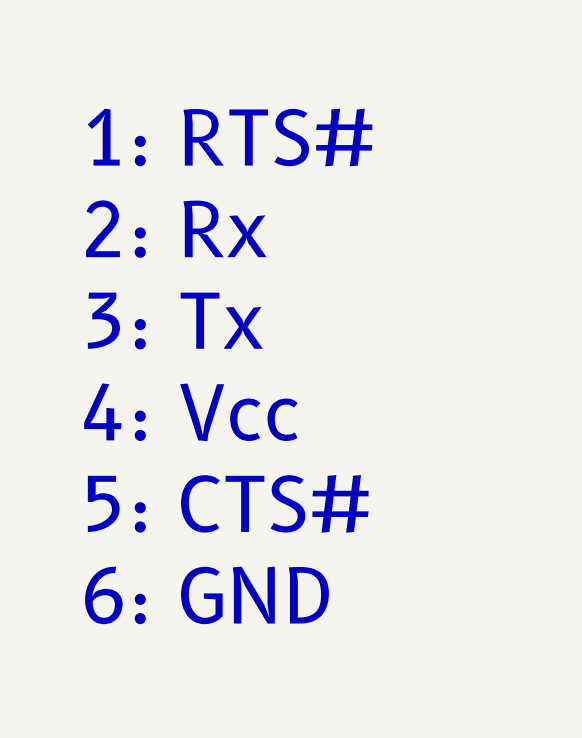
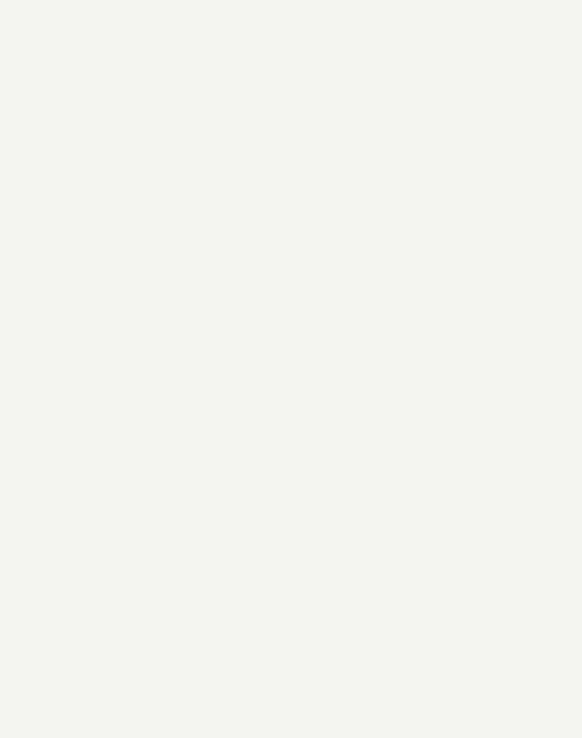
text: 1: RTS# (230, 137) -> none
text: 2: Rx (176, 229) -> none
text: 3: Tx (175, 321) -> none
text: 4: Vcc (190, 412) -> none
text: 5: CTS# (228, 503) -> none
text: 6: GND (206, 595) -> none

